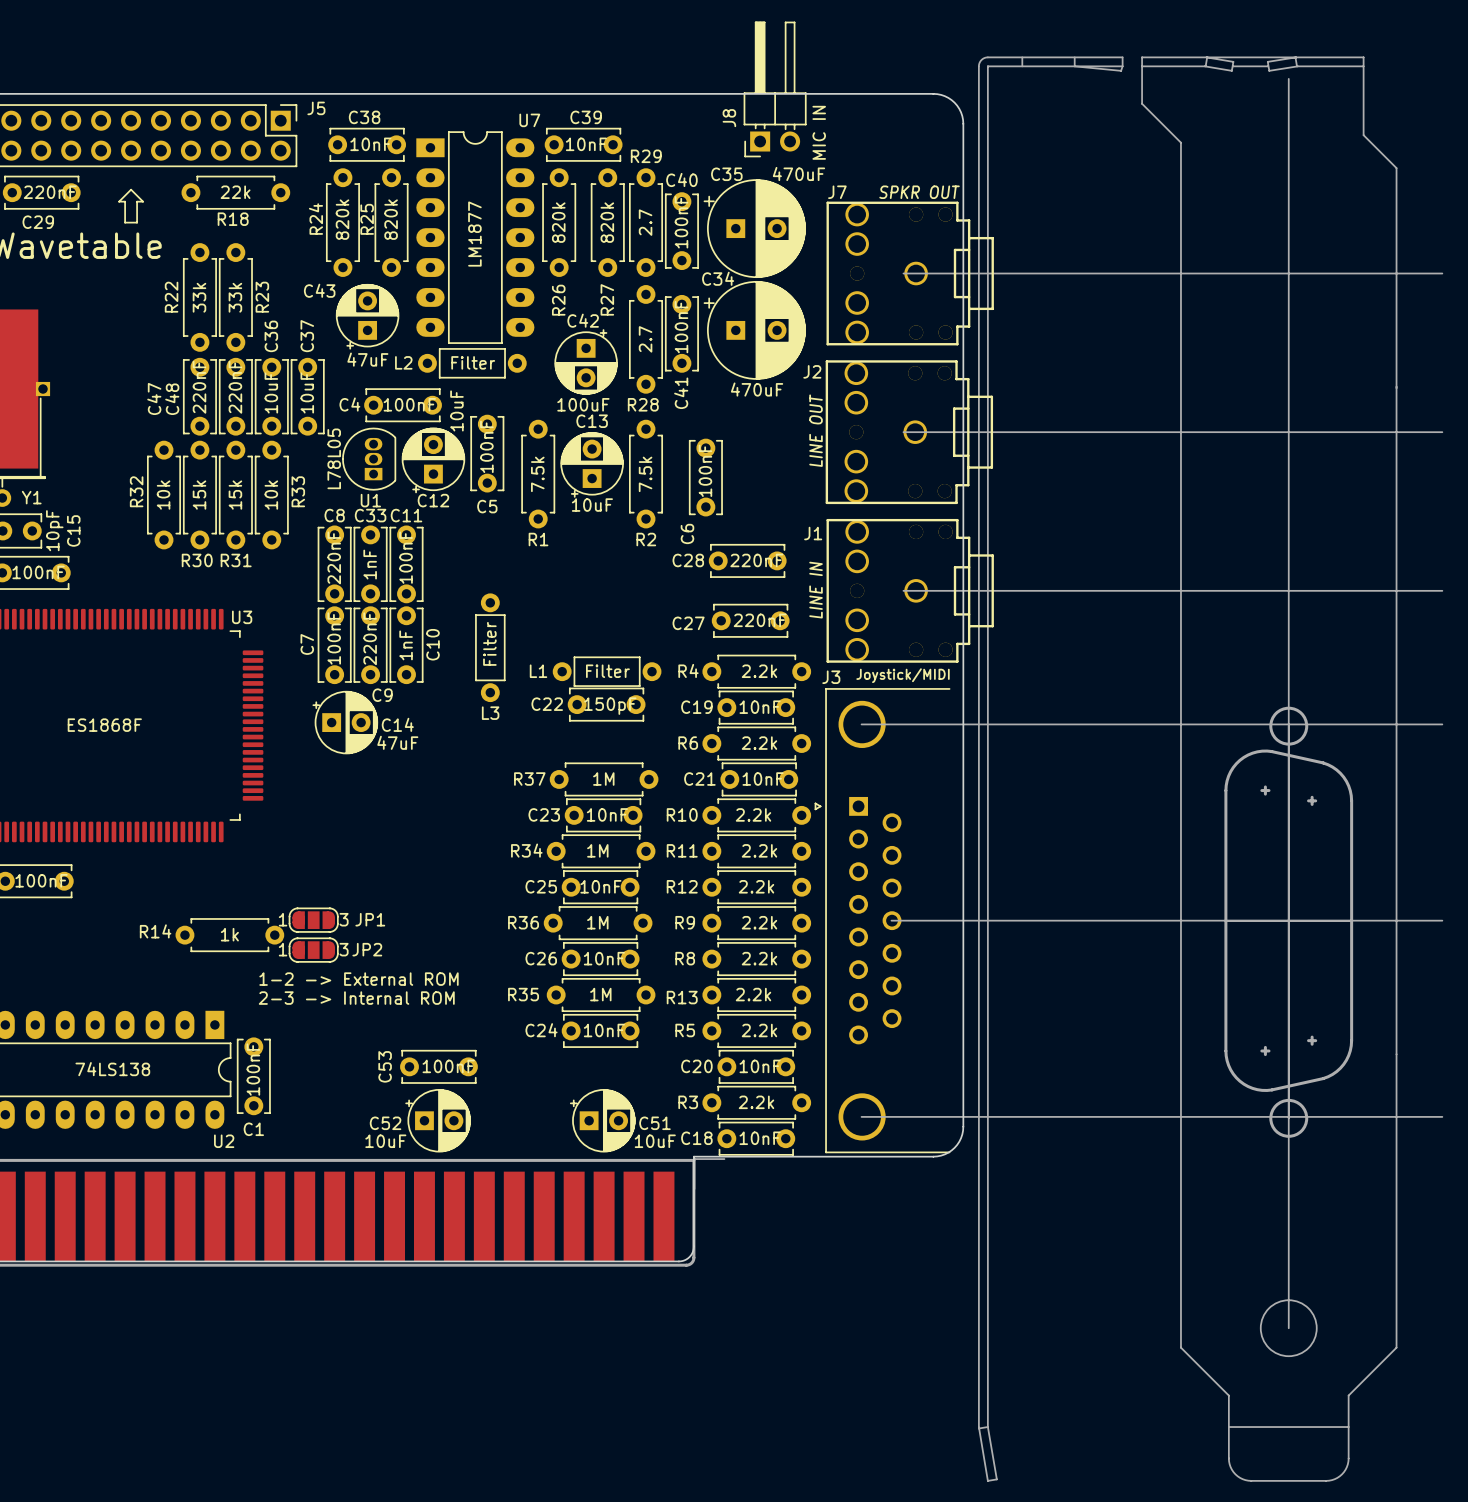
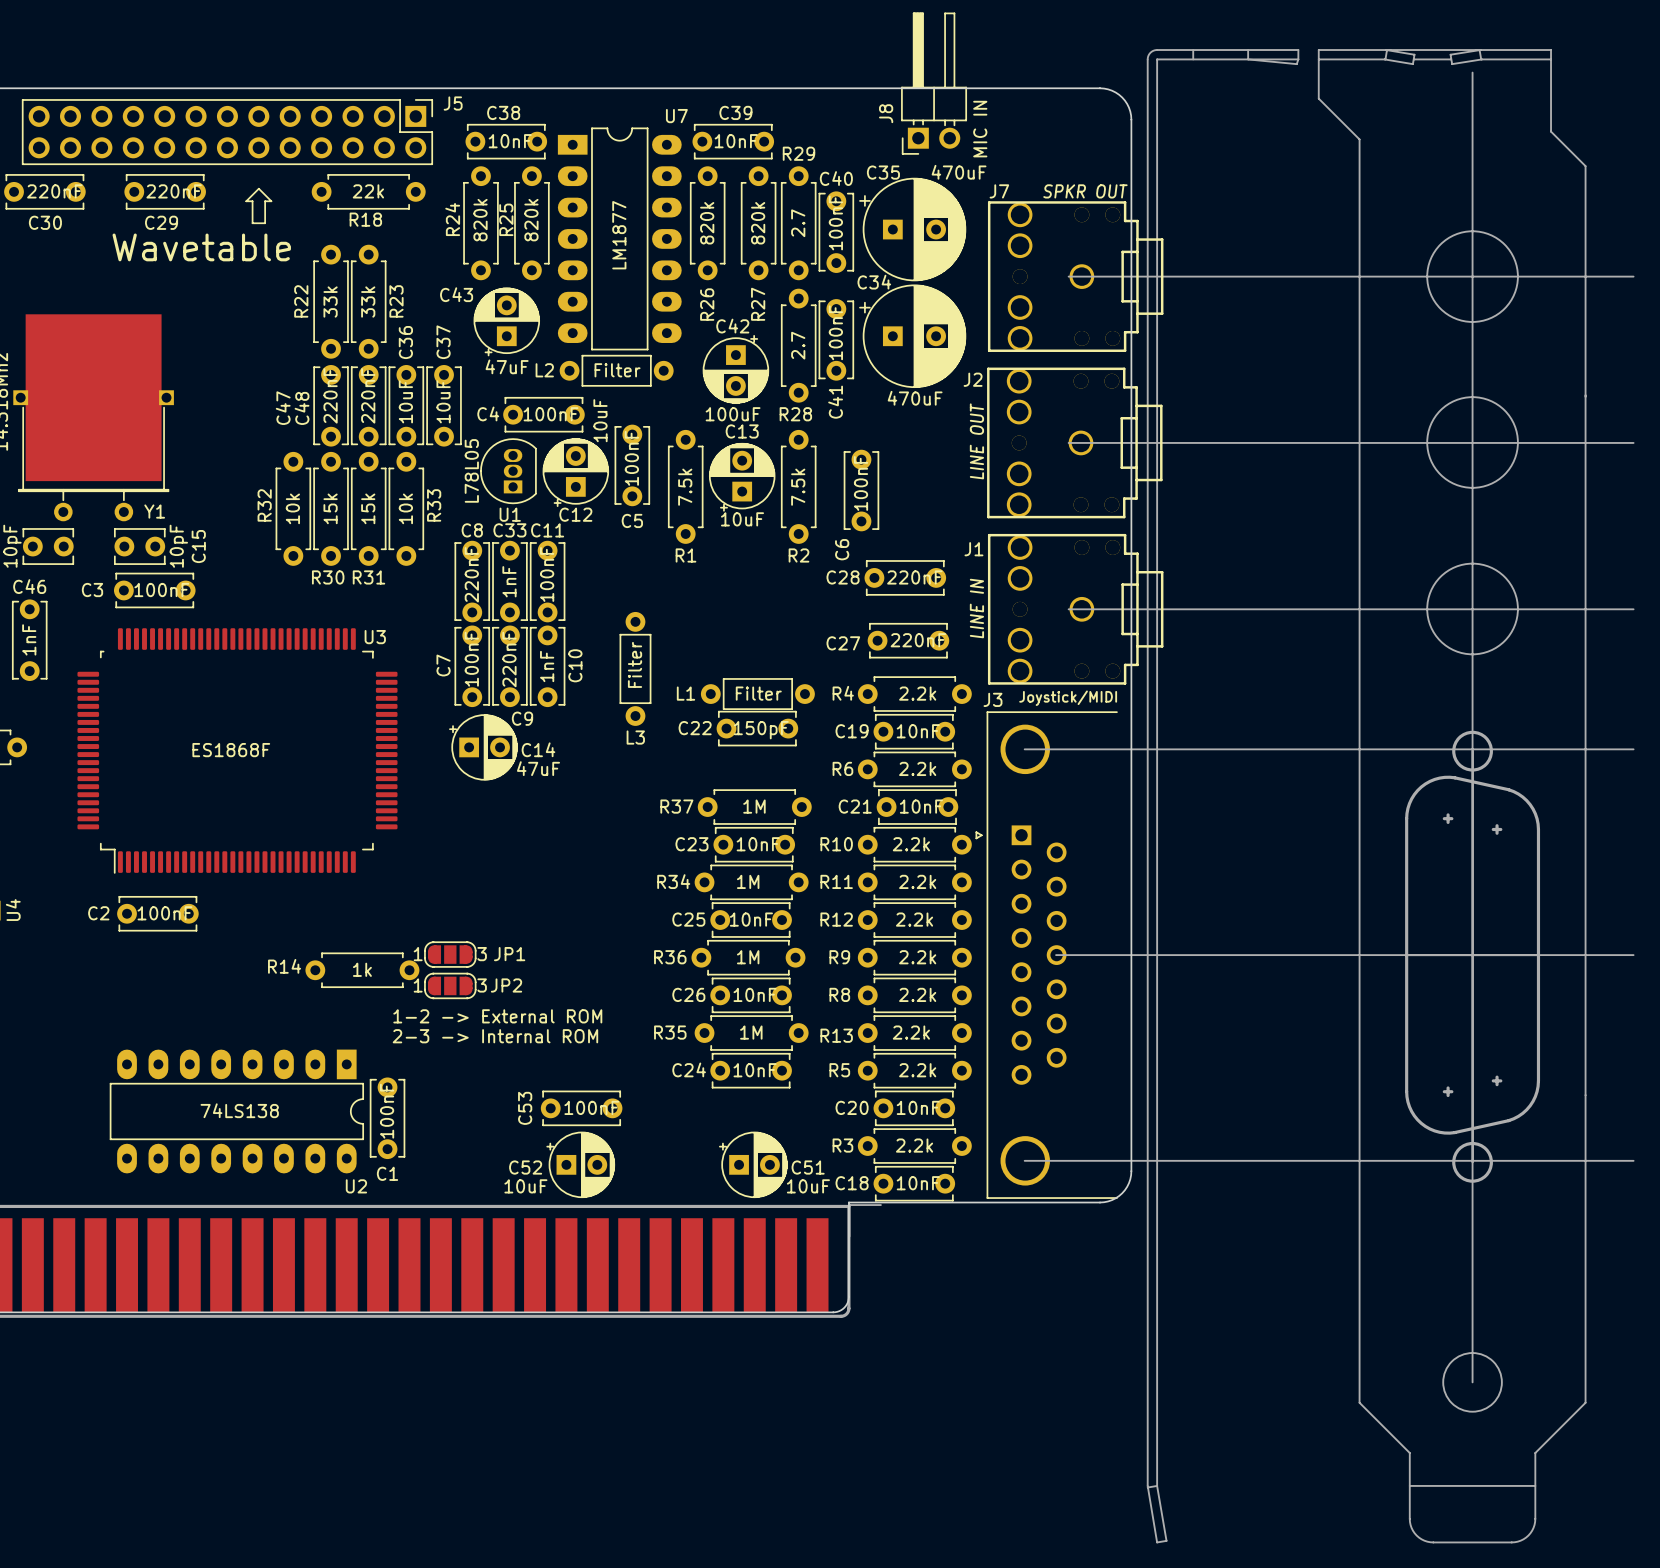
drawing: none -> [1426, 230, 1519, 323]
drawing: none -> [1426, 396, 1519, 489]
drawing: none -> [1426, 562, 1519, 656]

